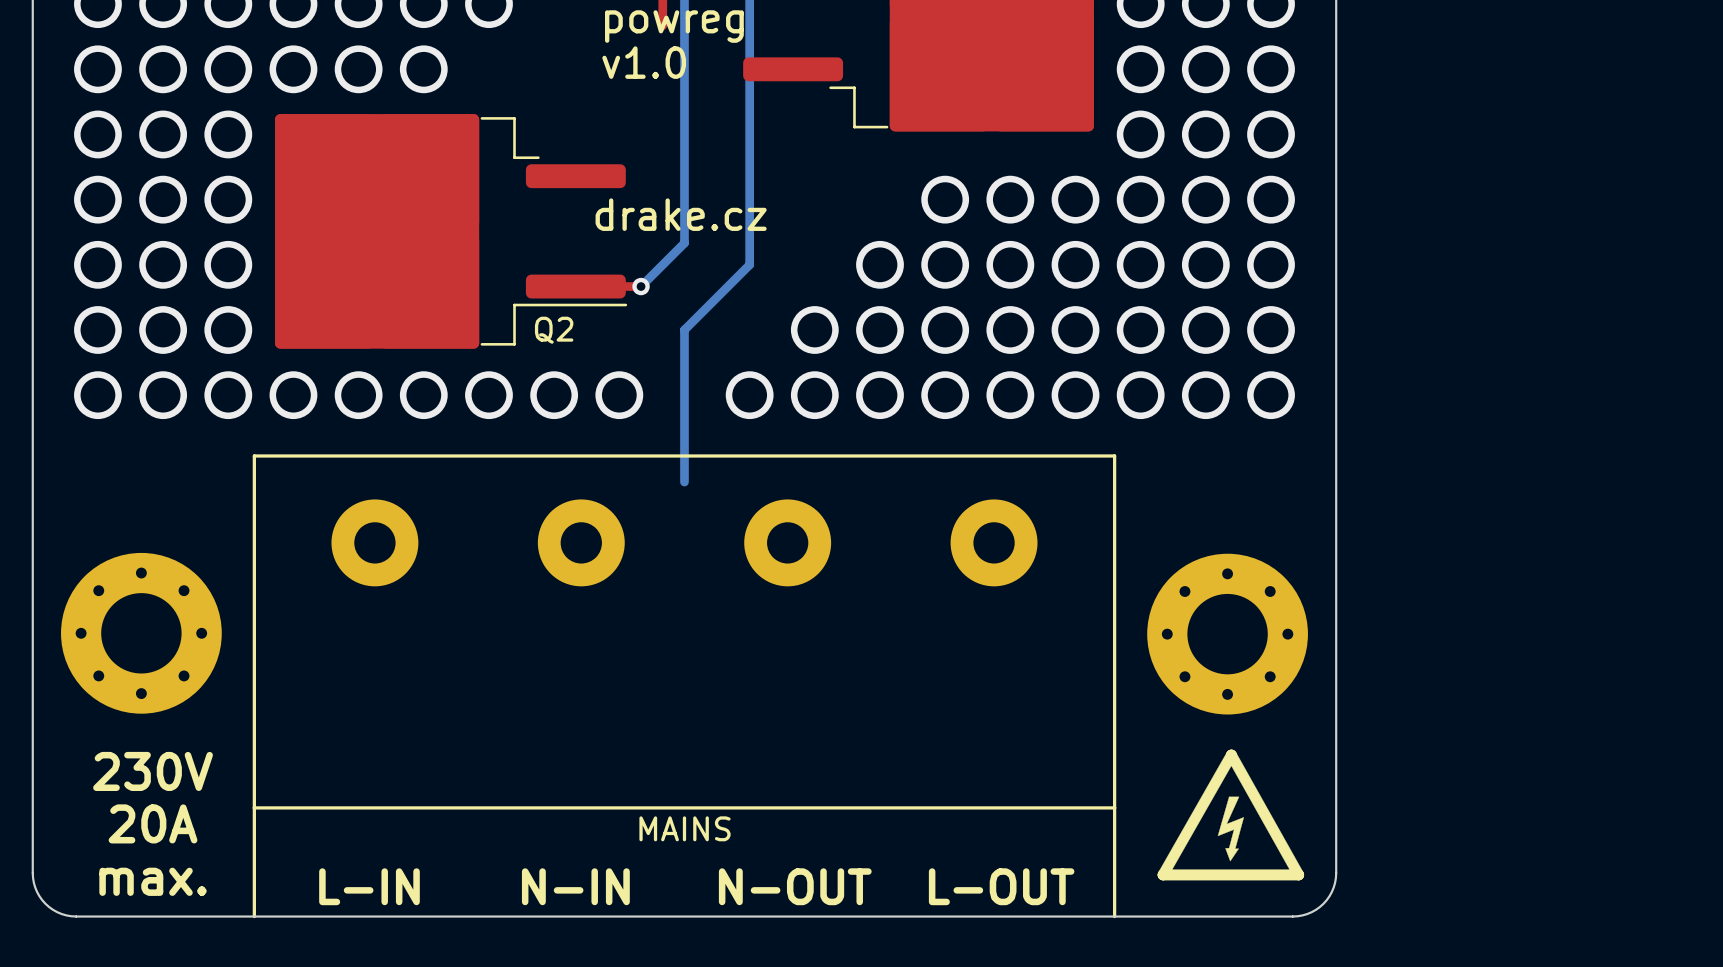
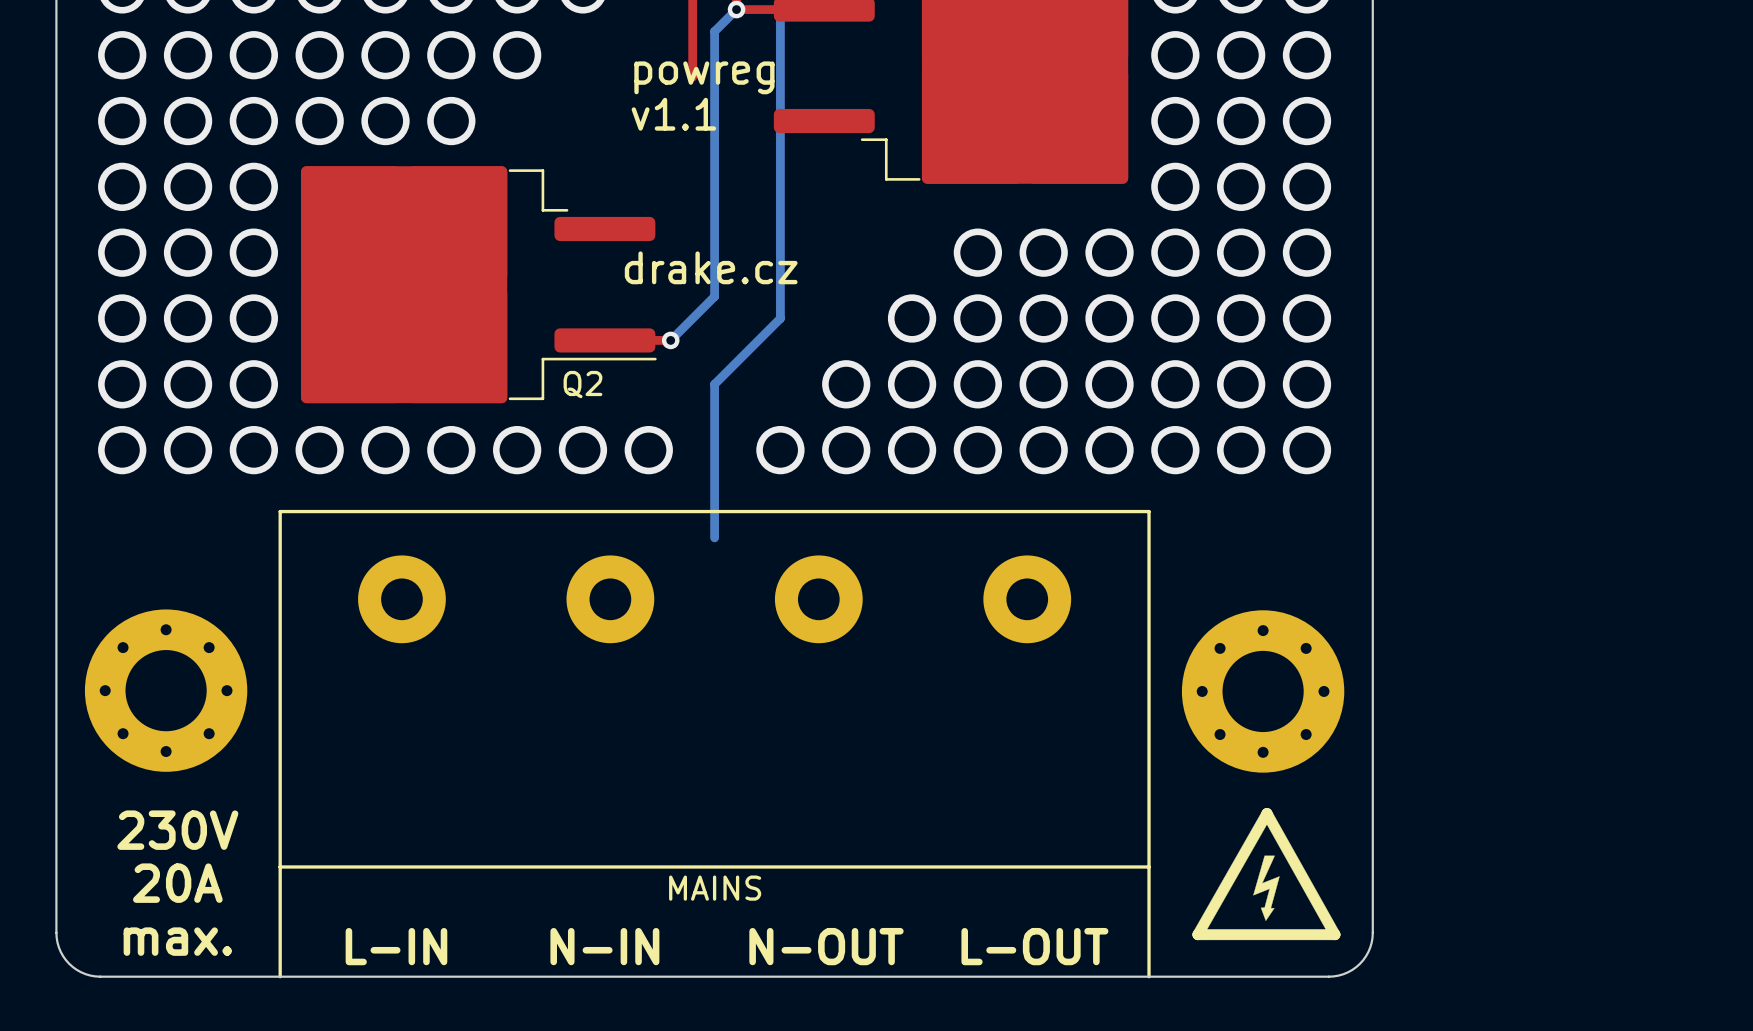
text: v1.0 (644, 62) -> v1.1 (673, 114)

